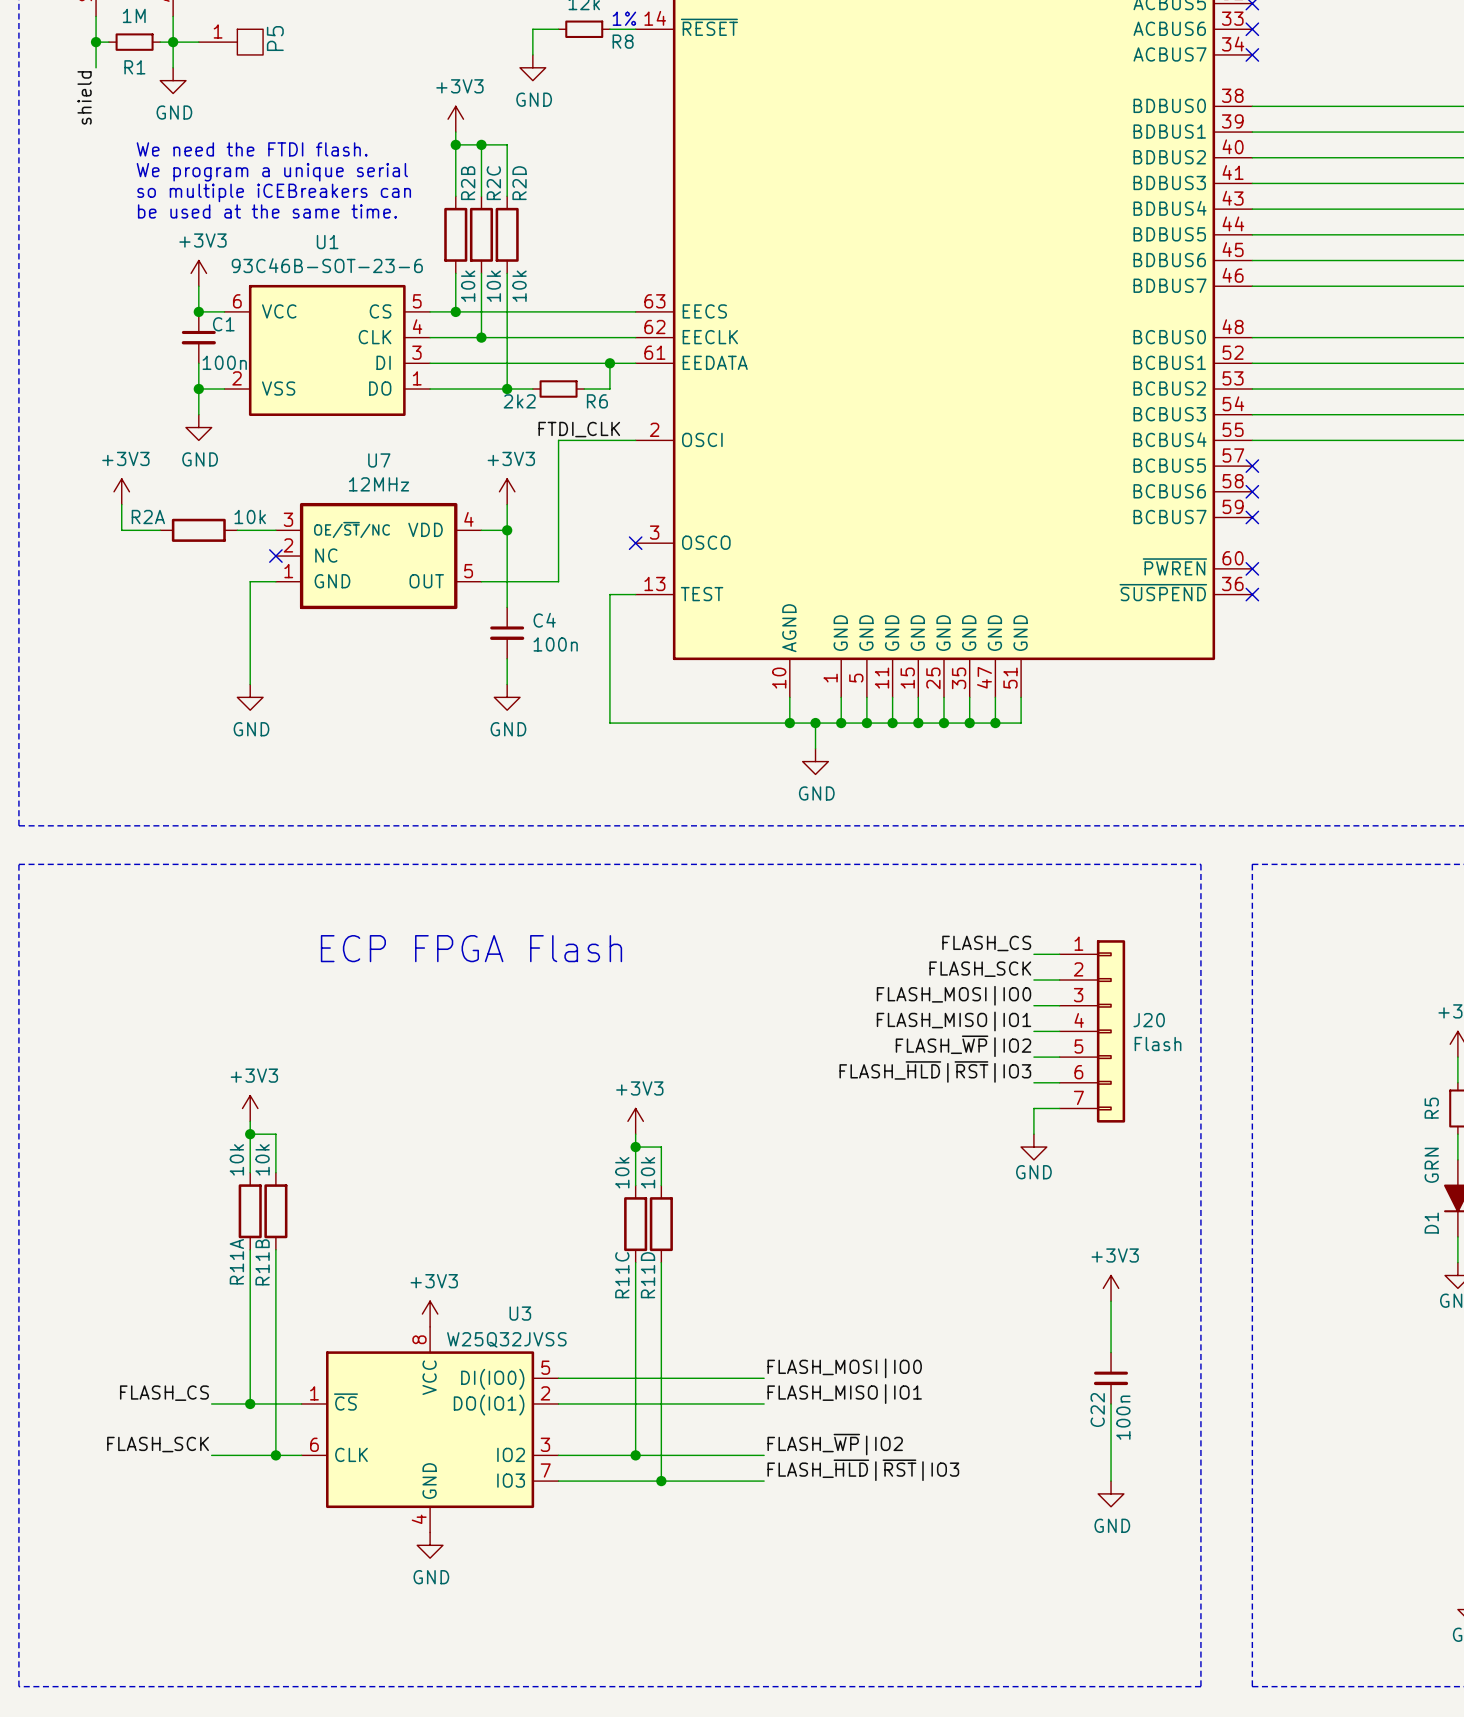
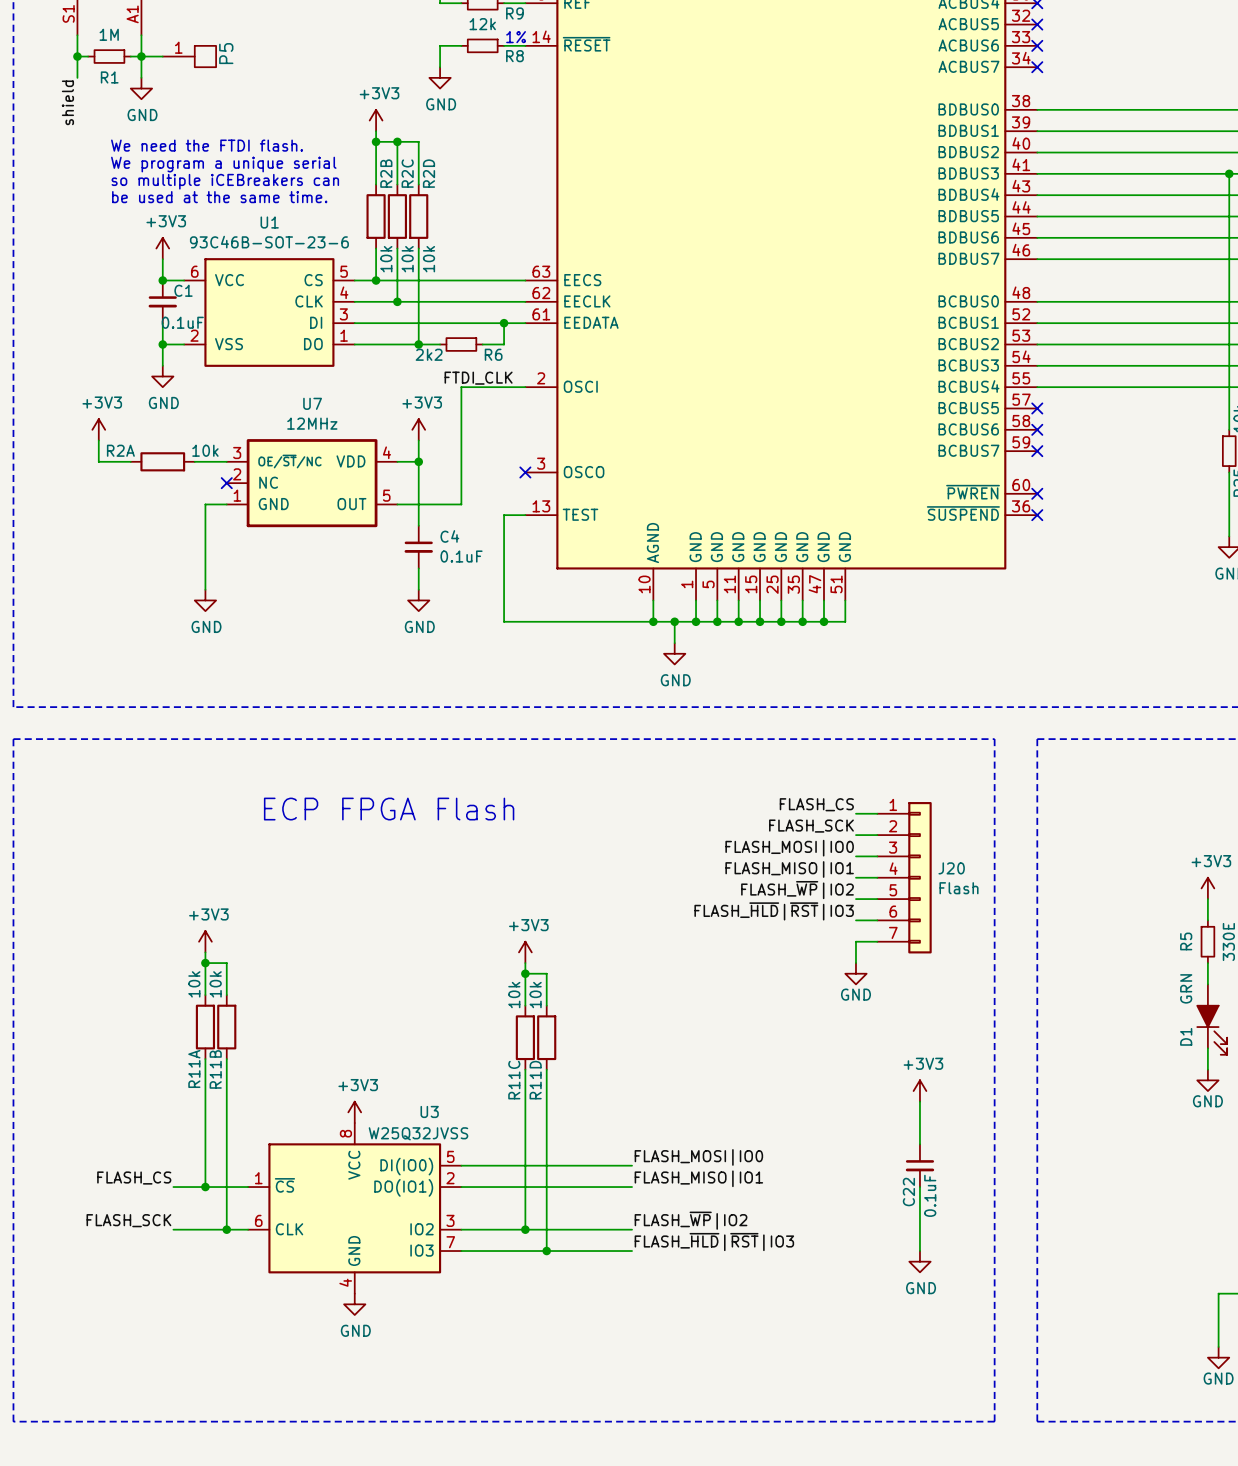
C1 value: 100n (224, 362) -> 0.1uF (182, 322)
C4 value: 100n (555, 644) -> 0.1uF (461, 556)
C22 value: 100n (1123, 1417) -> 0.1uF (930, 1195)

